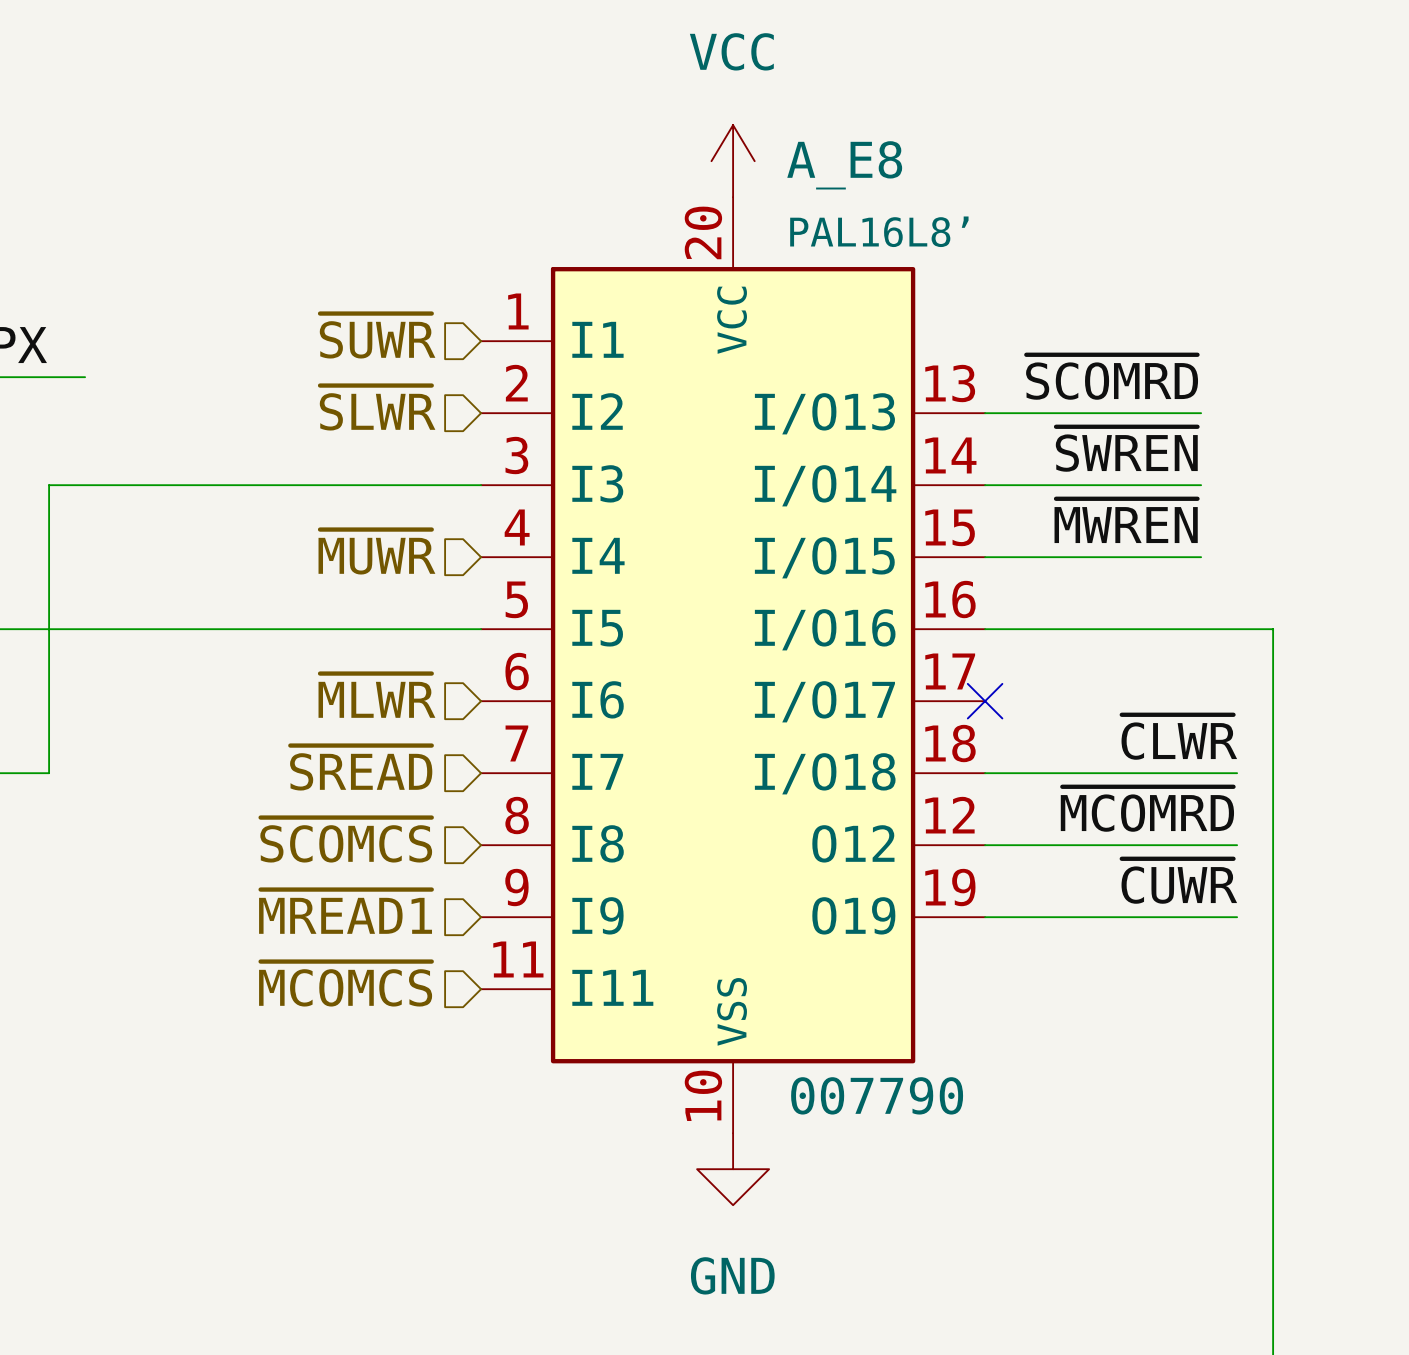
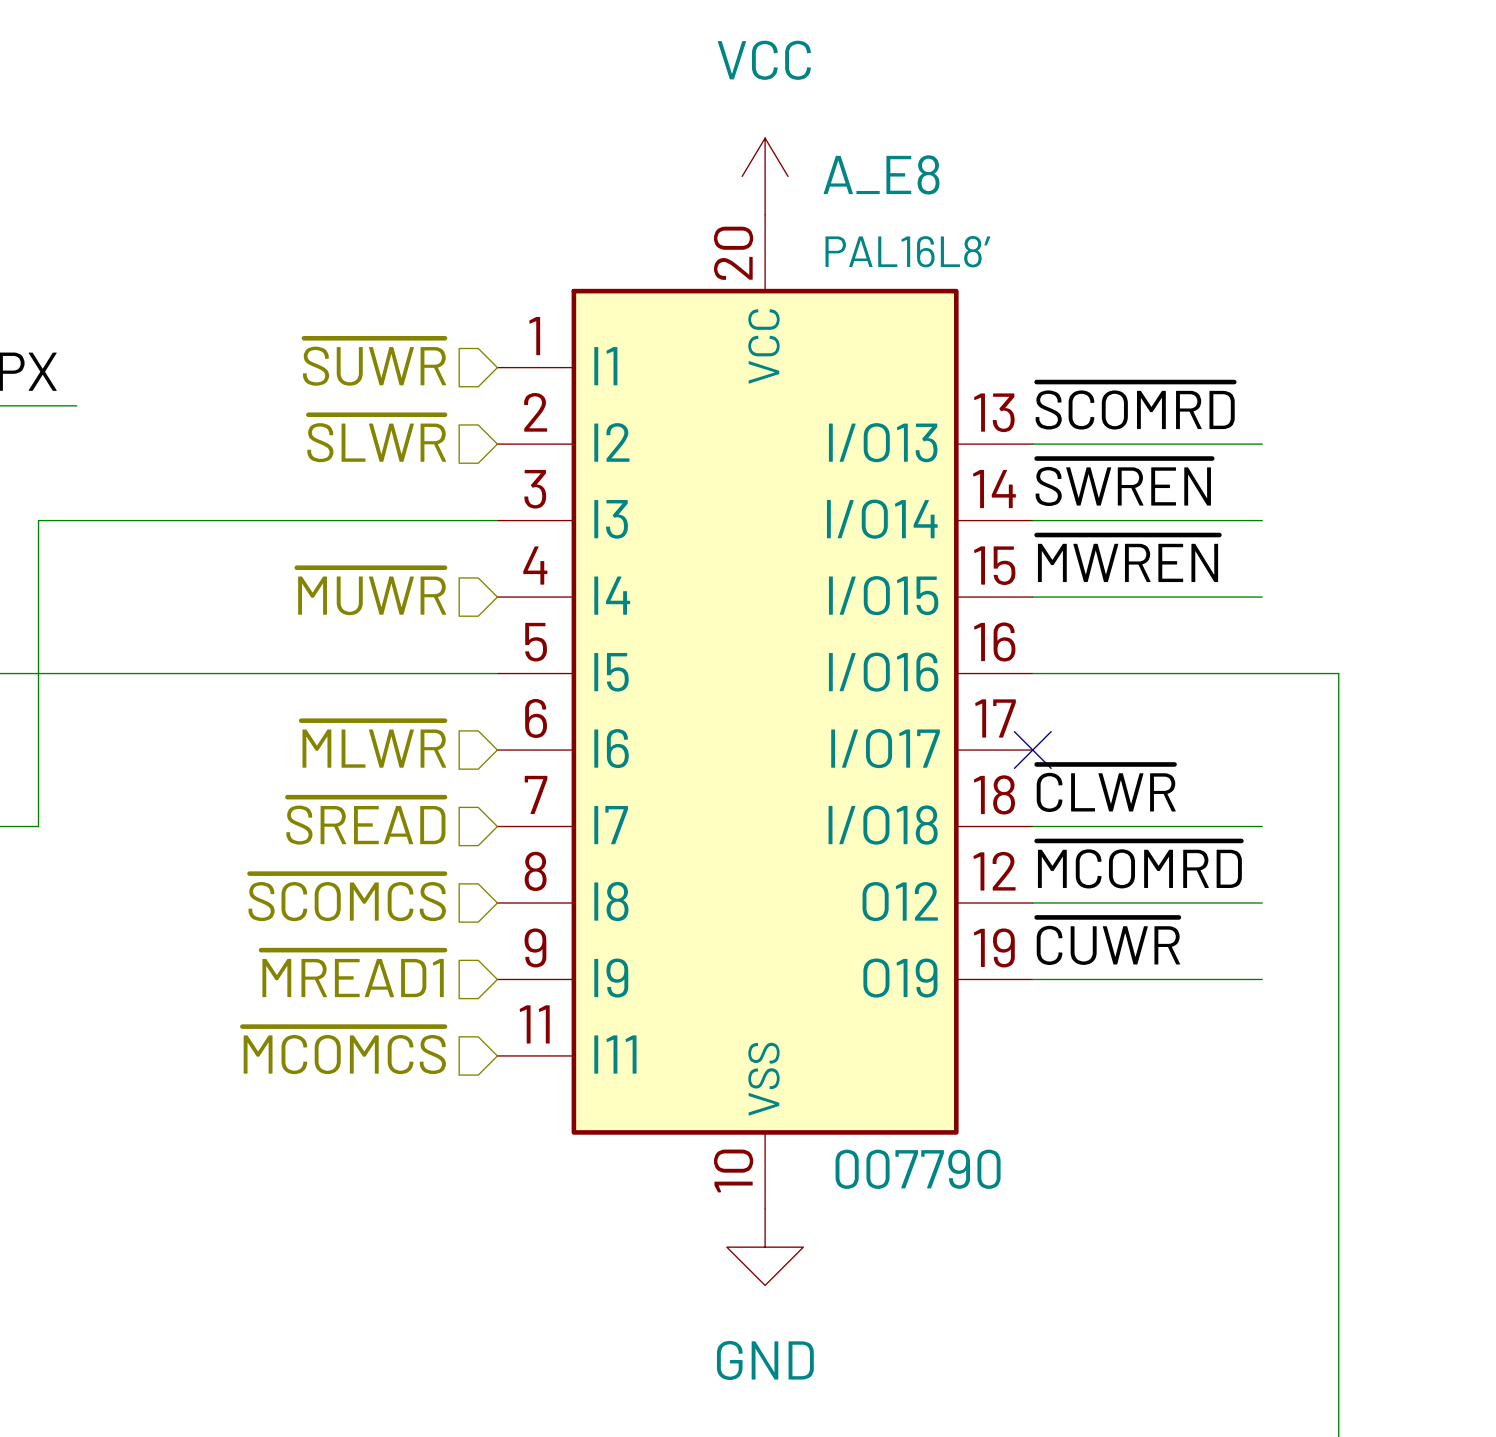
label position: ~{SCOMRD} (1112, 377) -> ~{SCOMRD} (1135, 405)
label position: ~{SWREN} (1126, 449) -> ~{SWREN} (1123, 482)
label position: ~{MWREN} (1126, 520) -> ~{MWREN} (1128, 558)
label position: ~{CLWR} (1179, 737) -> ~{CLWR} (1106, 788)
wire: (1201, 773) (1237, 773) -> none
label position: ~{MCOMRD} (1147, 809) -> ~{MCOMRD} (1139, 864)
wire: (1201, 845) (1237, 845) -> none
label position: ~{CUWR} (1179, 881) -> ~{CUWR} (1108, 941)
wire: (1201, 917) (1237, 917) -> none

